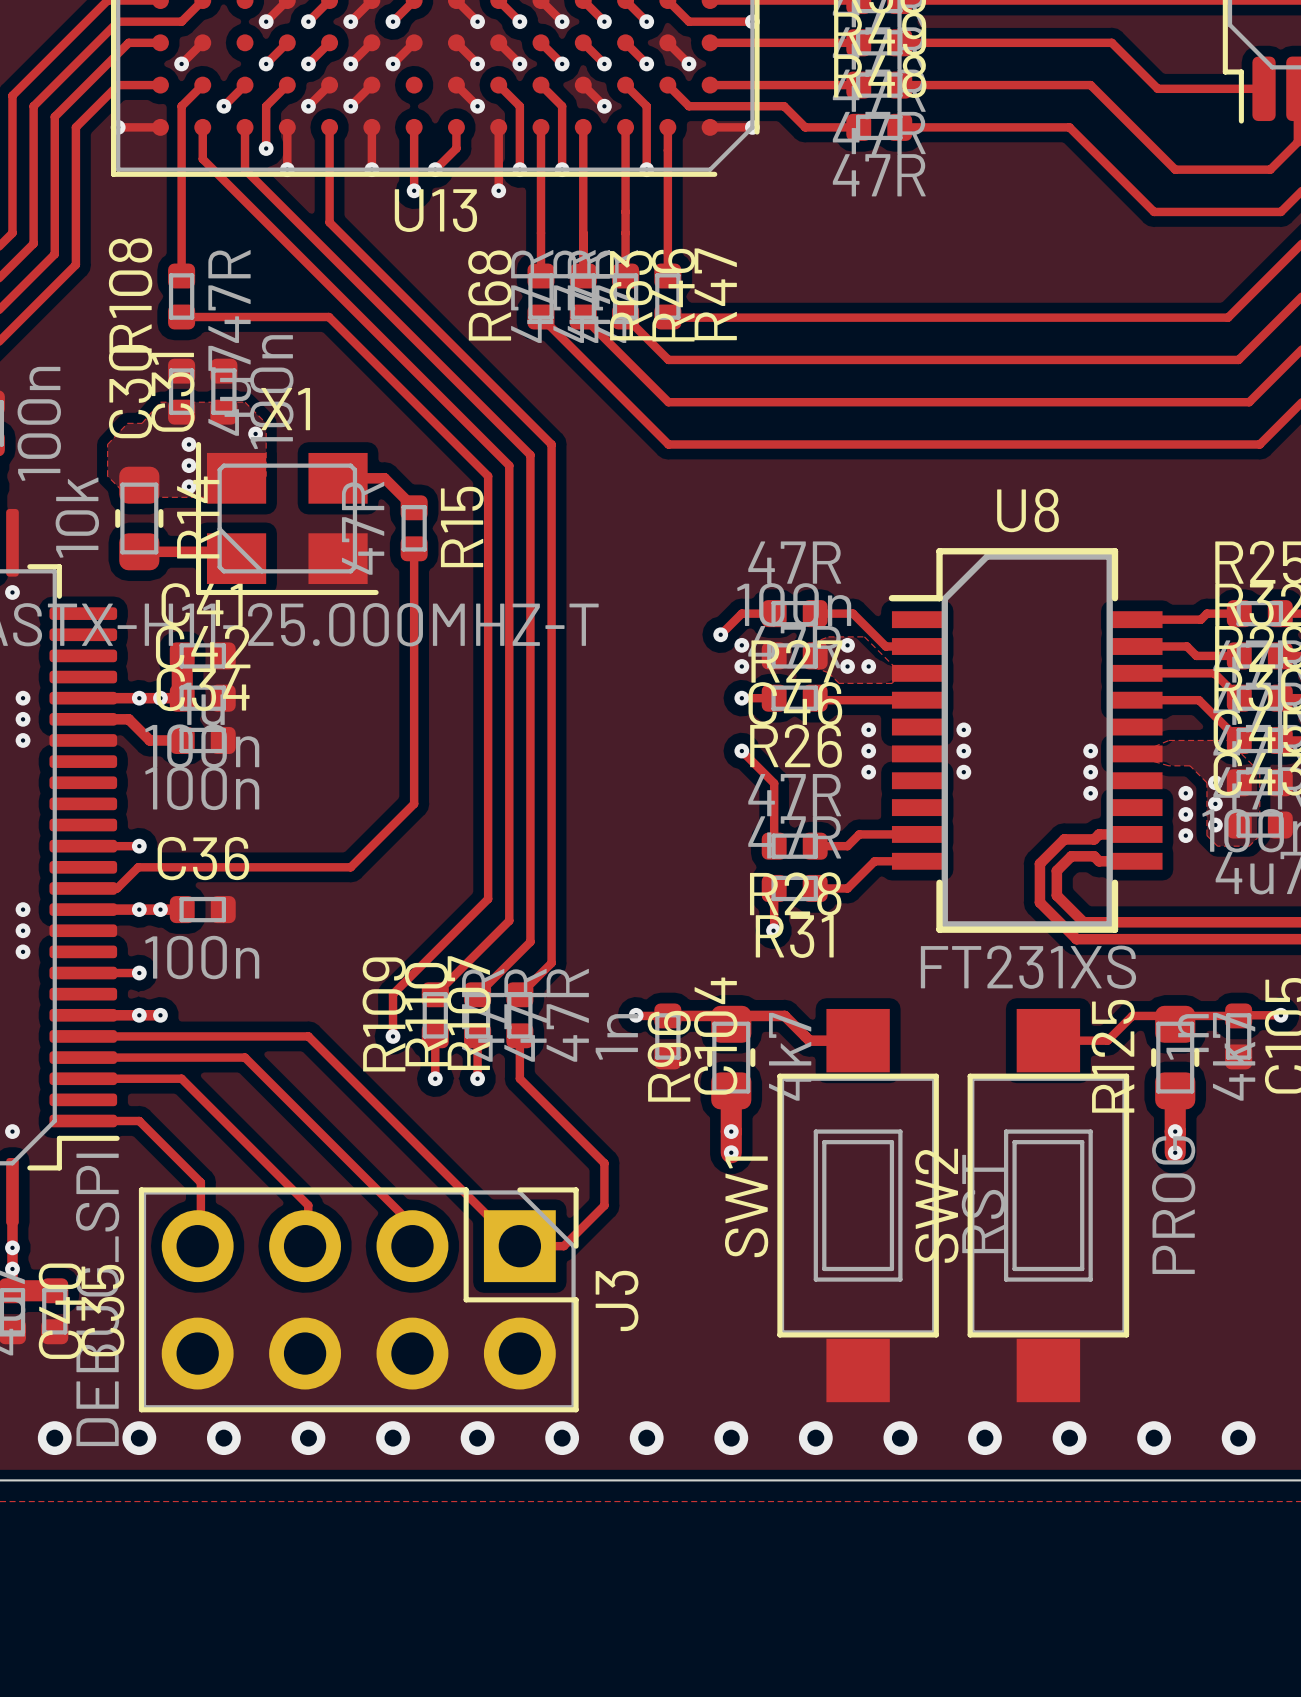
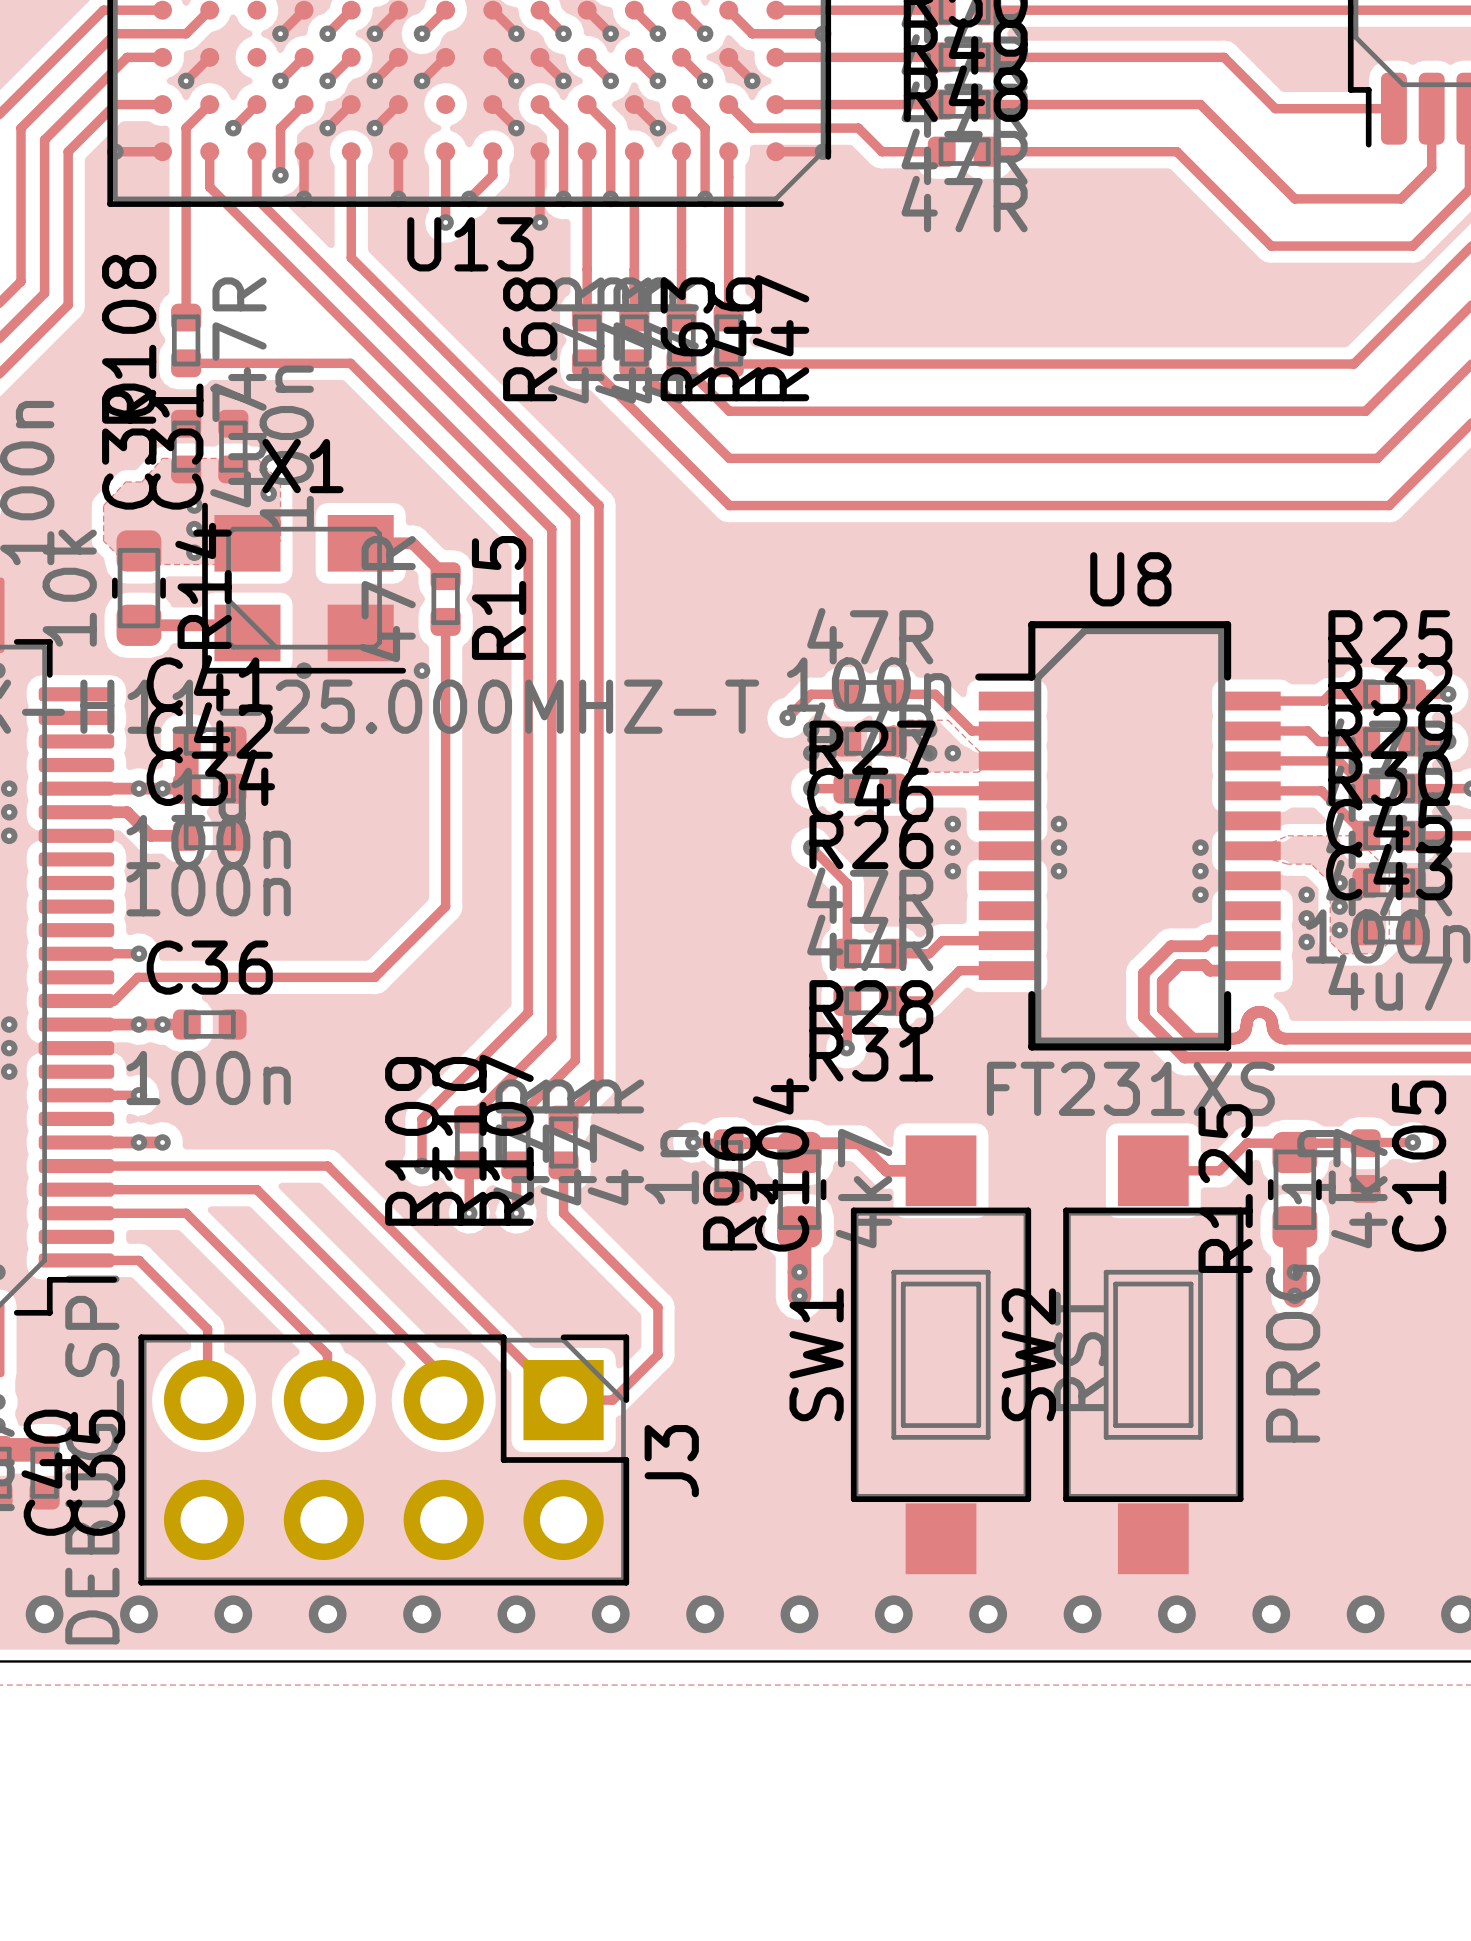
via: none -> (304, 670)
via: none -> (422, 670)
track: none -> (1246, 1024) (1249, 1016) (1259, 1011) (1267, 1014) (1272, 1024)
track: none -> (1272, 1025) (1275, 1033) (1285, 1038)
track: (1120, 922) (1166, 922) -> (1233, 1038) (1243, 1033) (1246, 1025)

